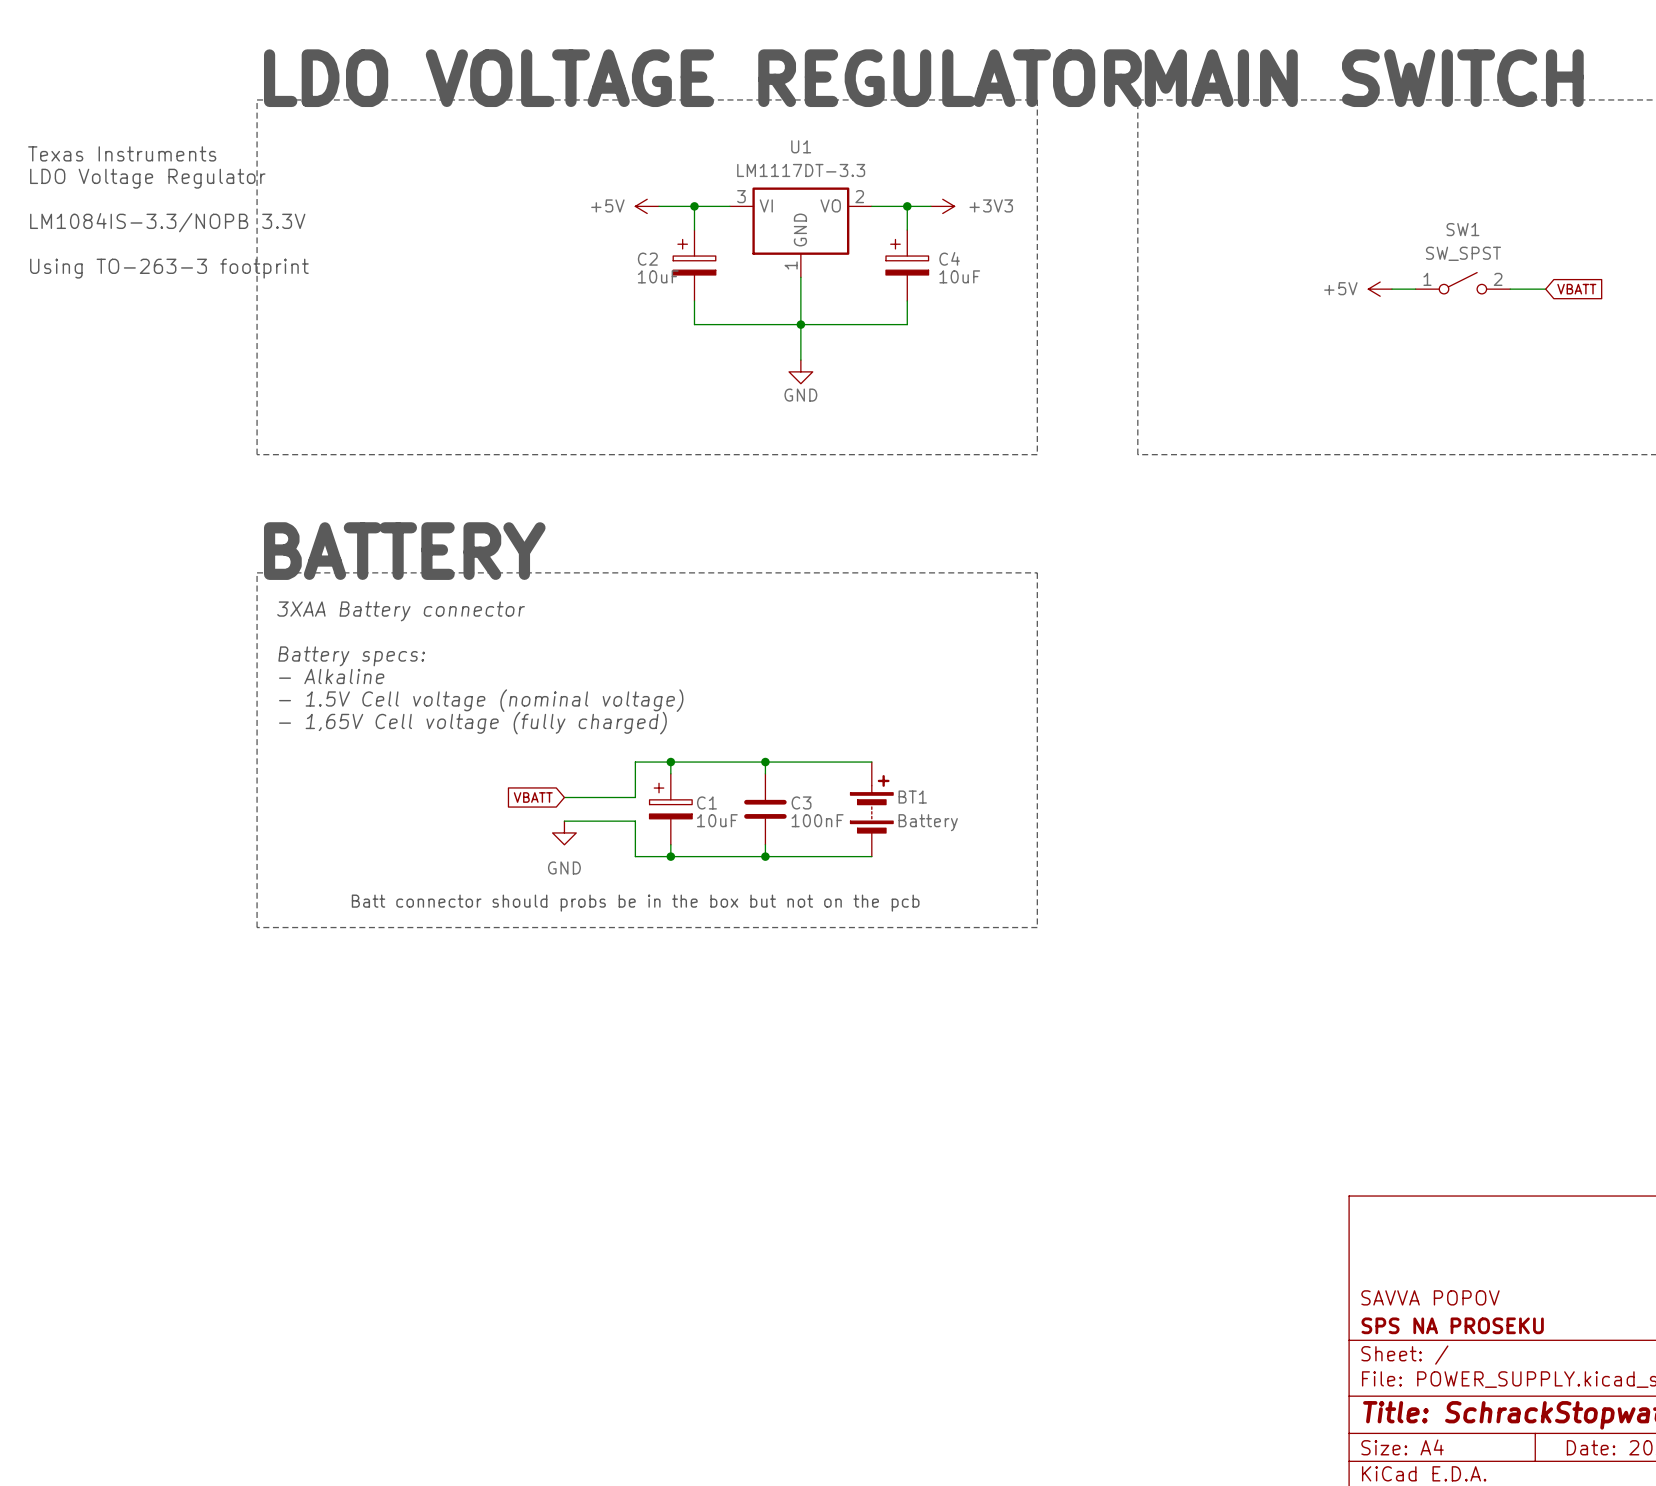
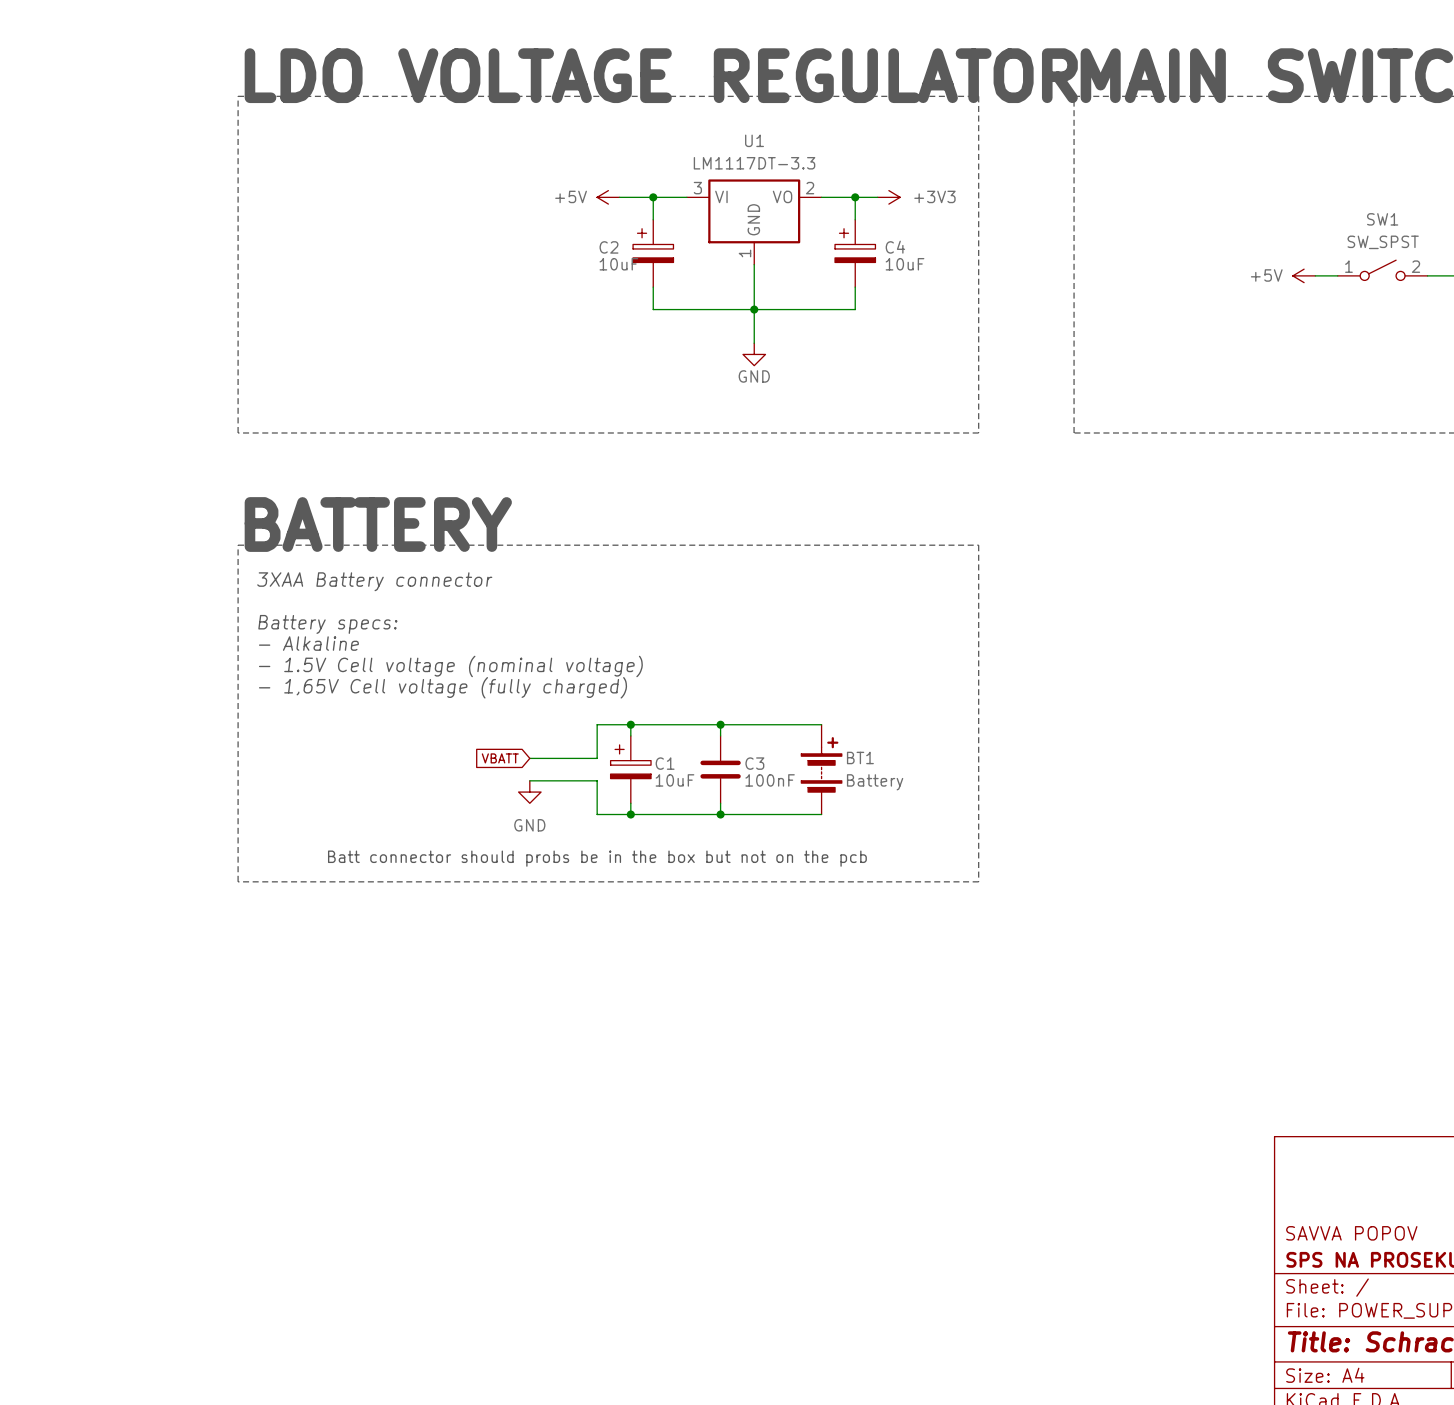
text: Texas Instruments (122, 153) -> none
text: LDO Voltage Regulator (147, 178) -> none
text: LM1084IS-3.3/NOPB 3.3V (167, 222) -> none
text: Using TO-263-3 footprint (169, 268) -> none

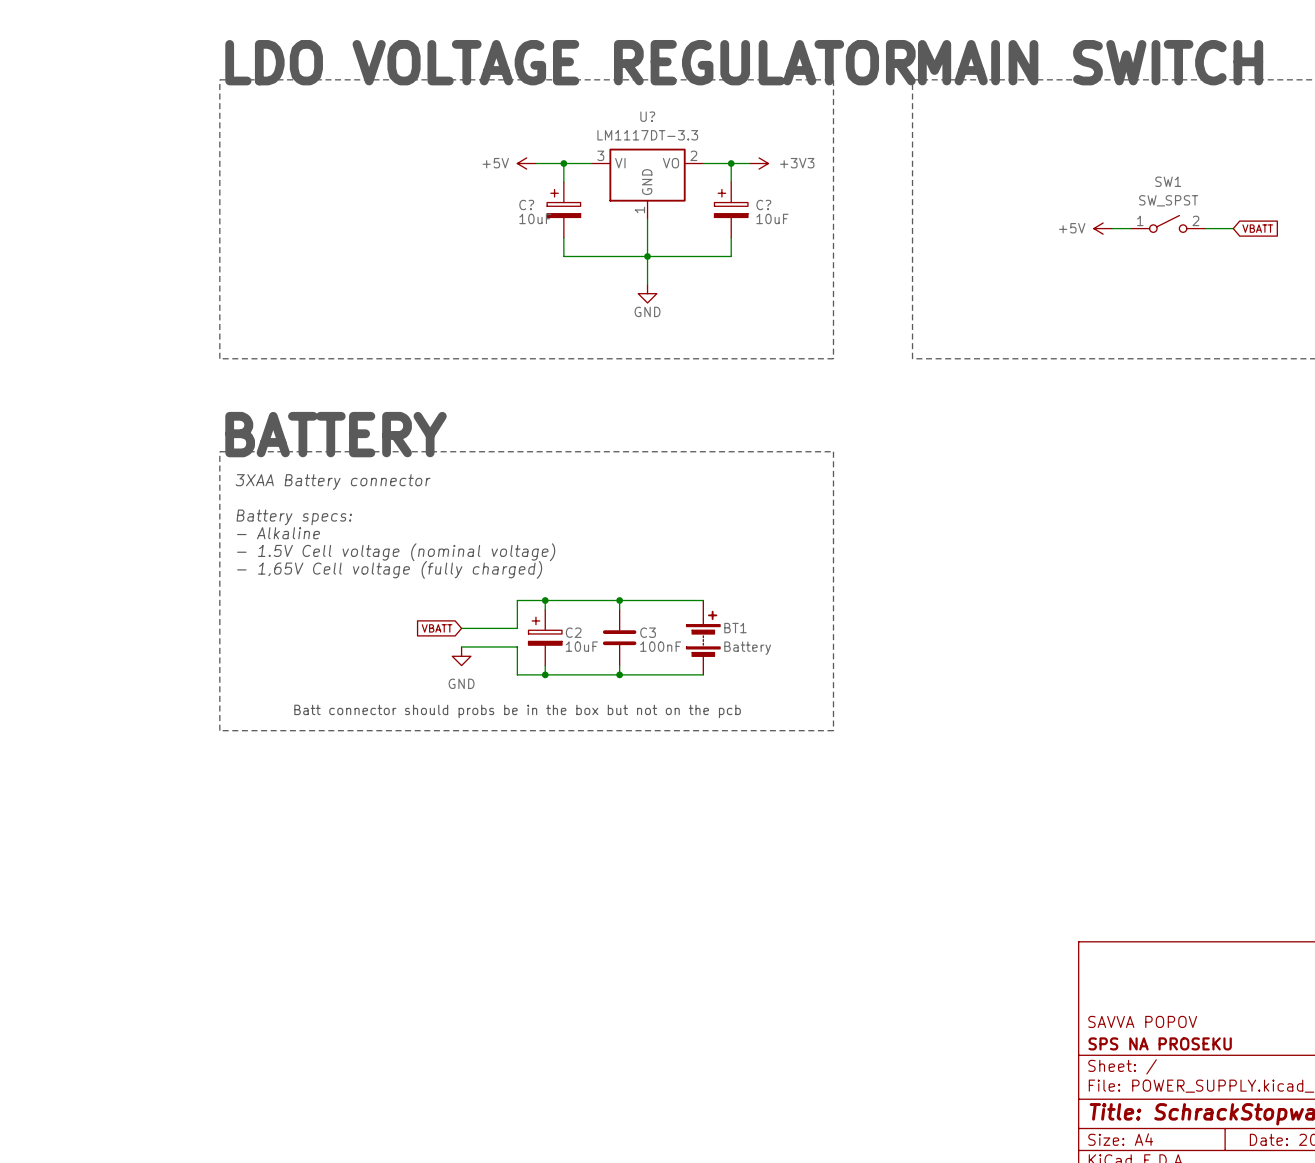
U1 name: U1 (754, 140) -> U? (647, 116)
C2 name: C2 (608, 247) -> C? (526, 205)
C4 name: C4 (895, 247) -> C? (763, 205)
C1 name: C1 (665, 763) -> C2 (573, 632)

